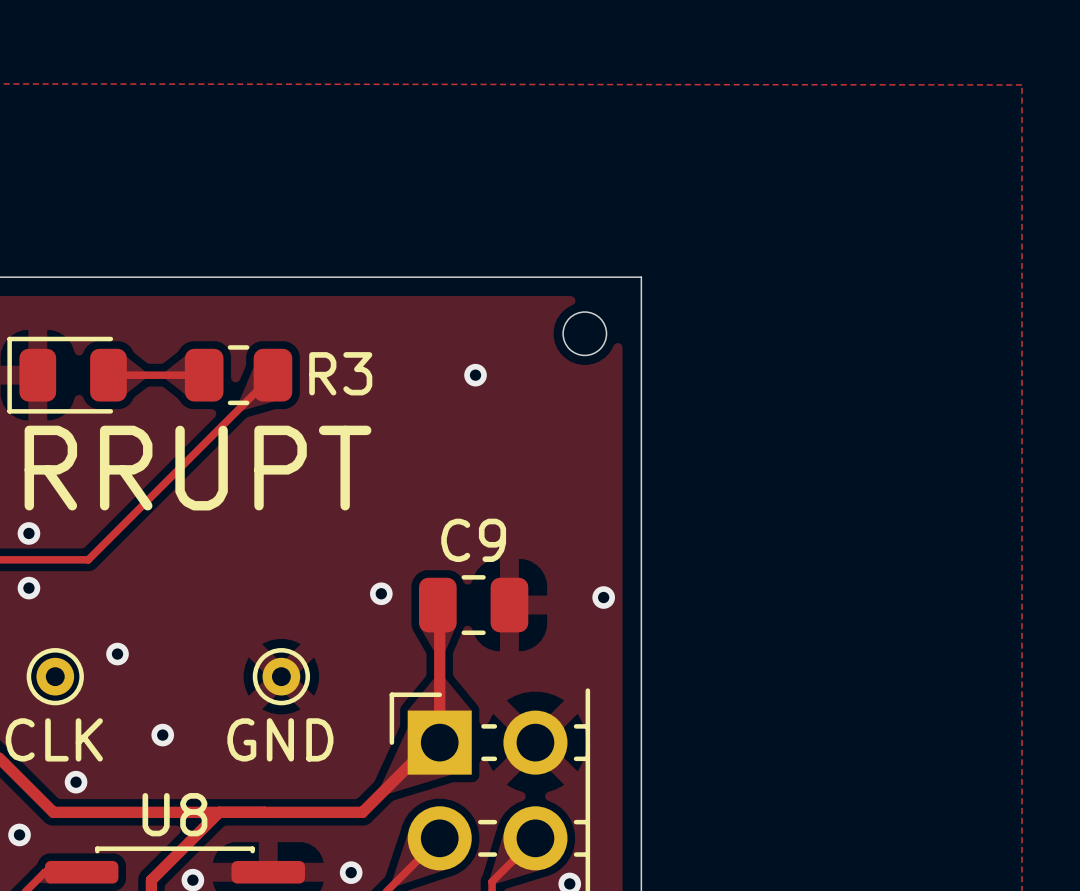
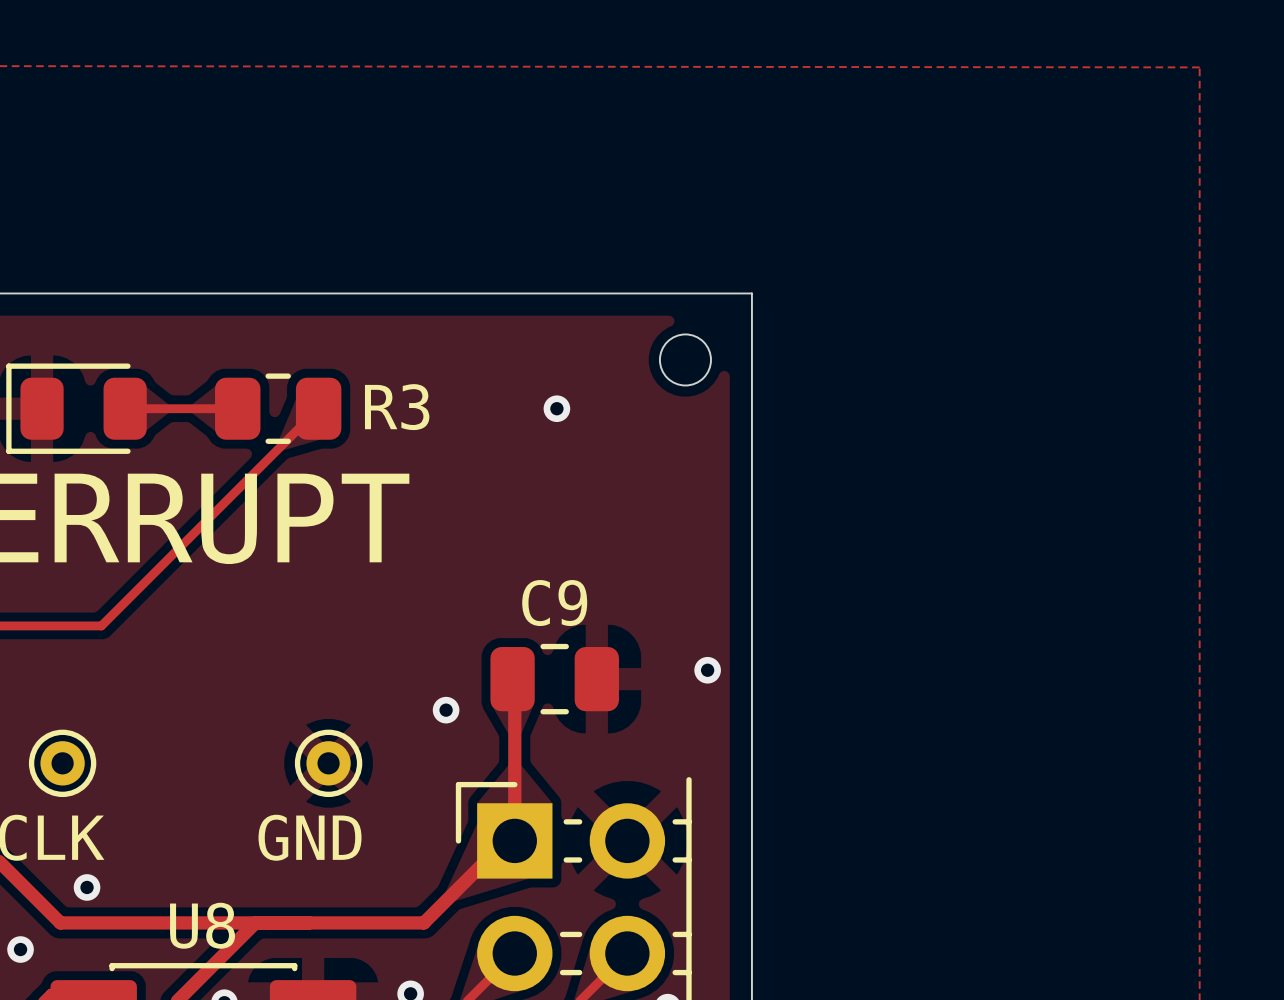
via: (28, 533) -> none
via: (28, 588) -> none
via position: (381, 593) -> (446, 710)
via: (117, 654) -> none
via: (162, 735) -> none

